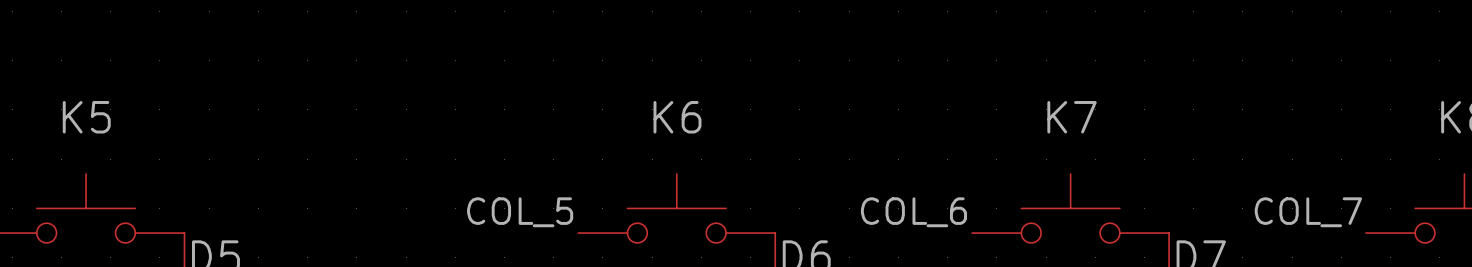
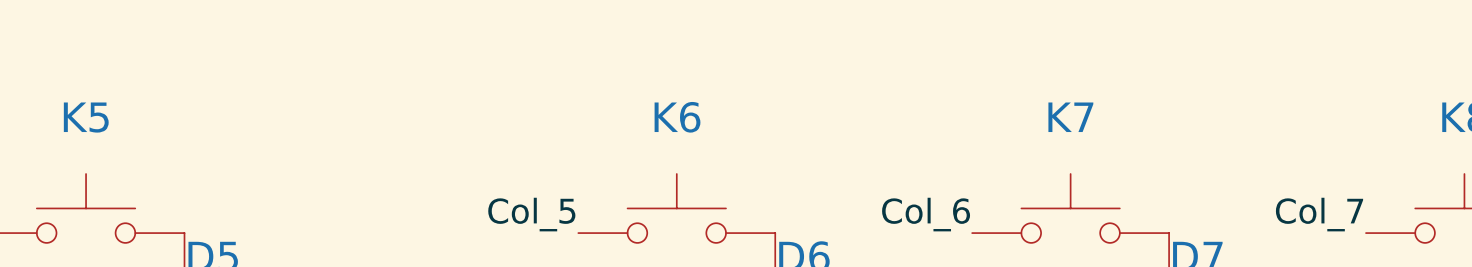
label: COL_5 (520, 212) -> Col_5 (531, 214)
label: COL_6 (913, 212) -> Col_6 (926, 214)
label: COL_7 (1308, 212) -> Col_7 (1319, 214)

